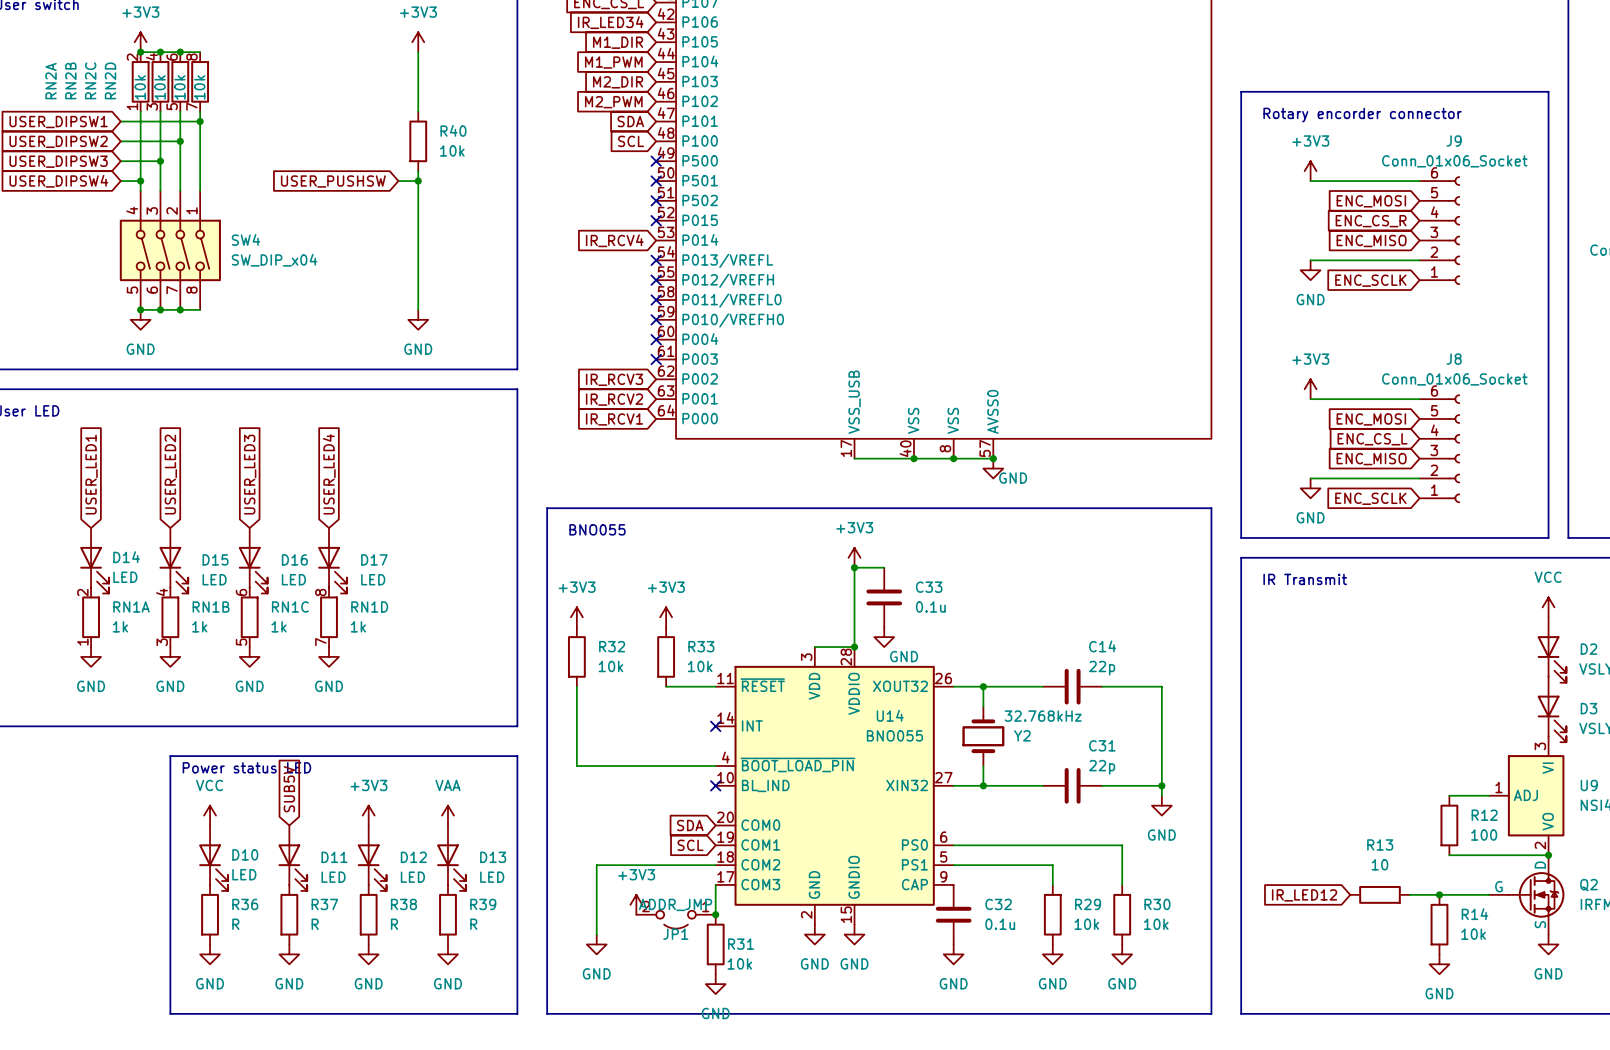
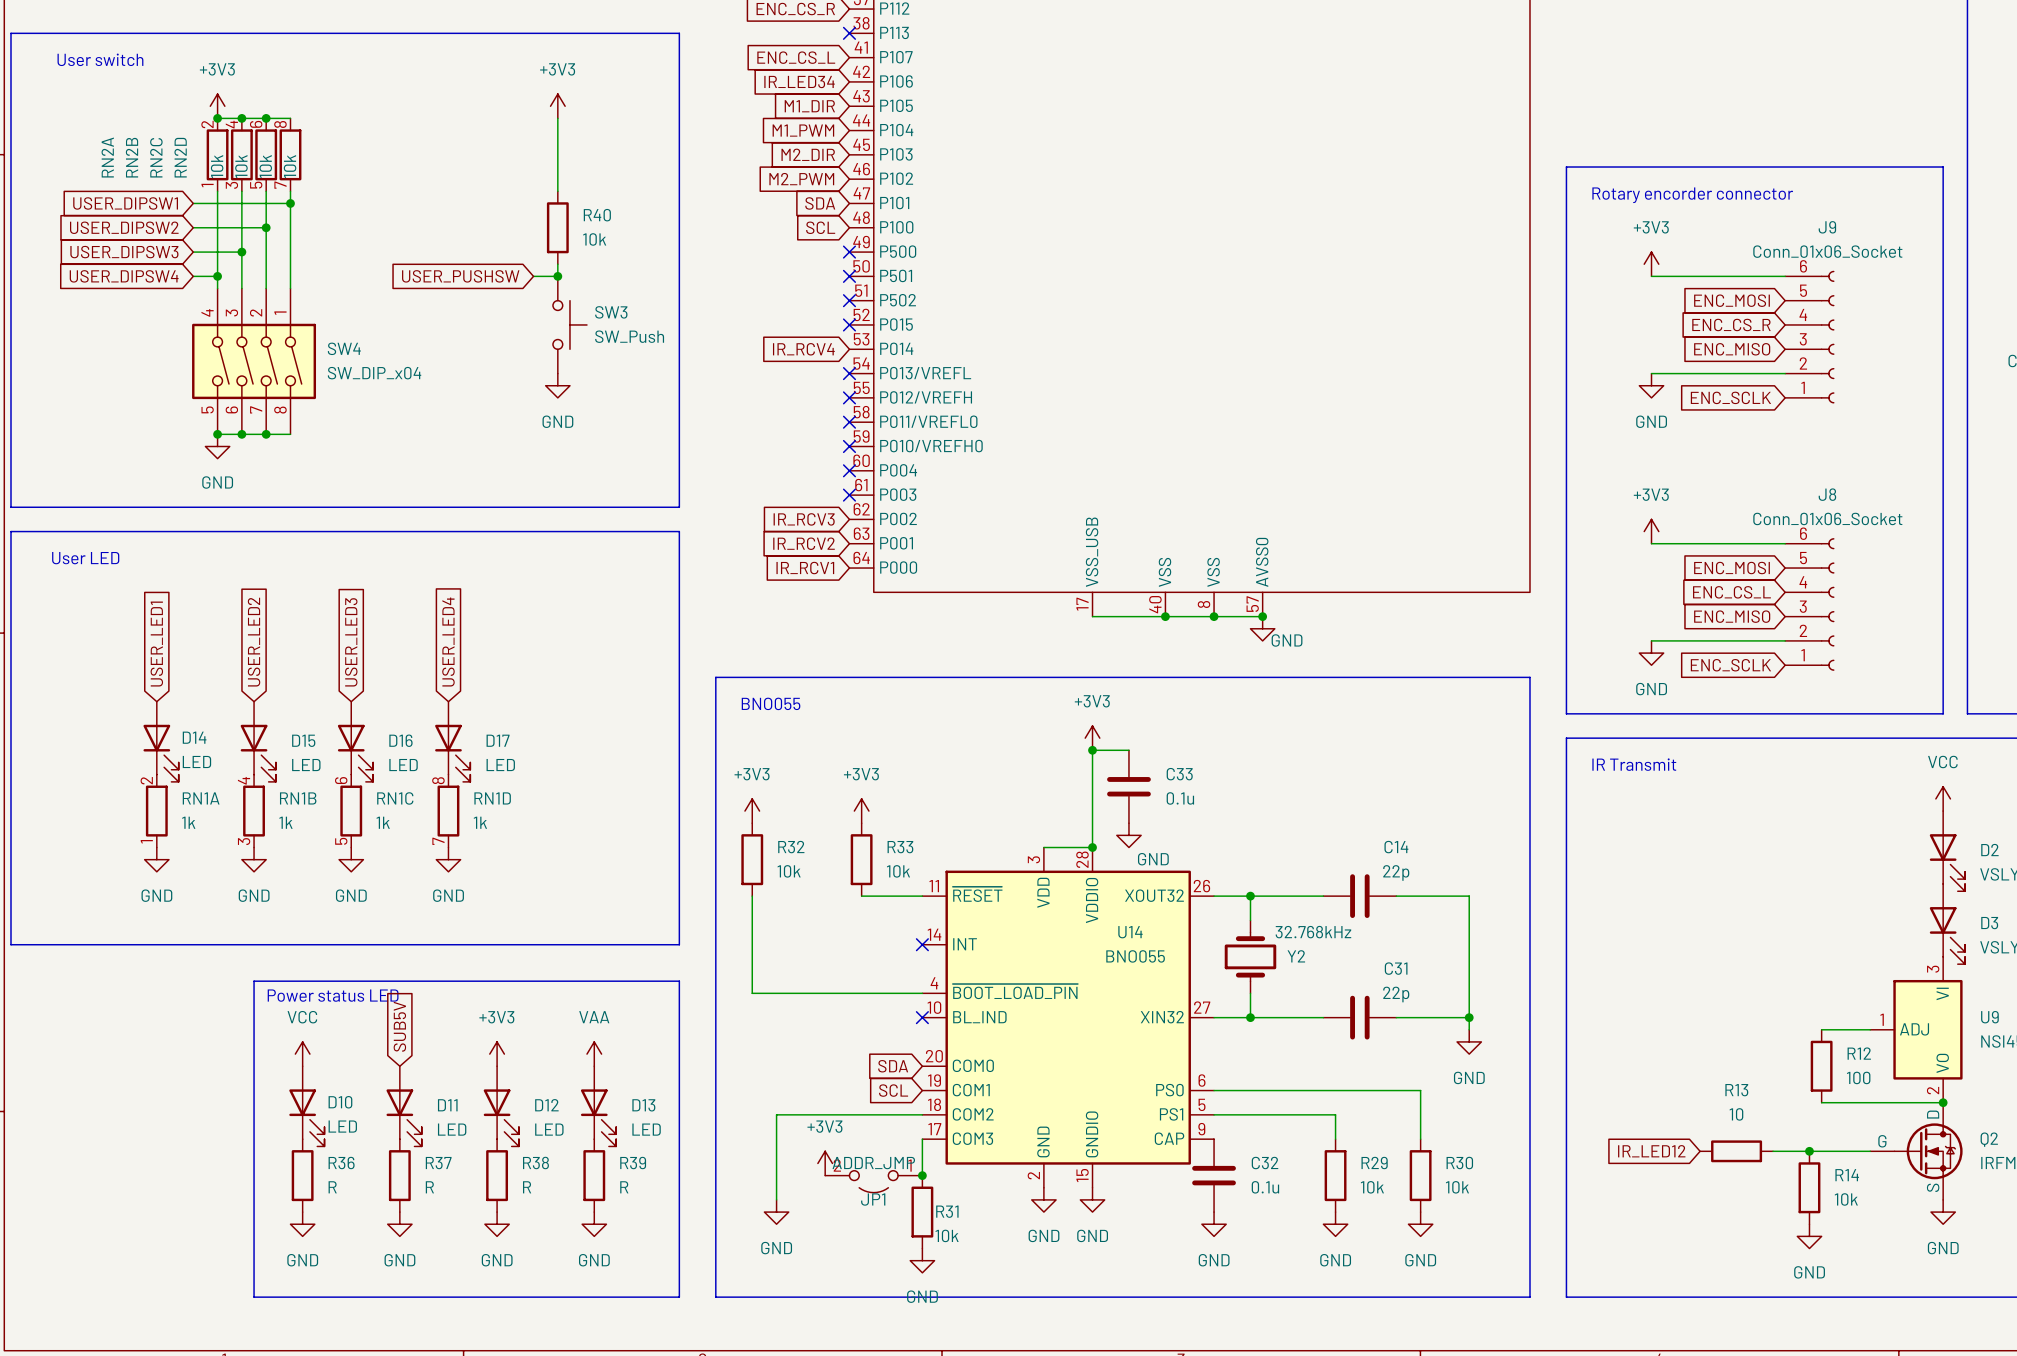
wire: (418, 181) (418, 309) -> none
SW3: none -> SW_Push (569, 324)
power symbol position: GND (418, 319) -> GND (557, 385)

